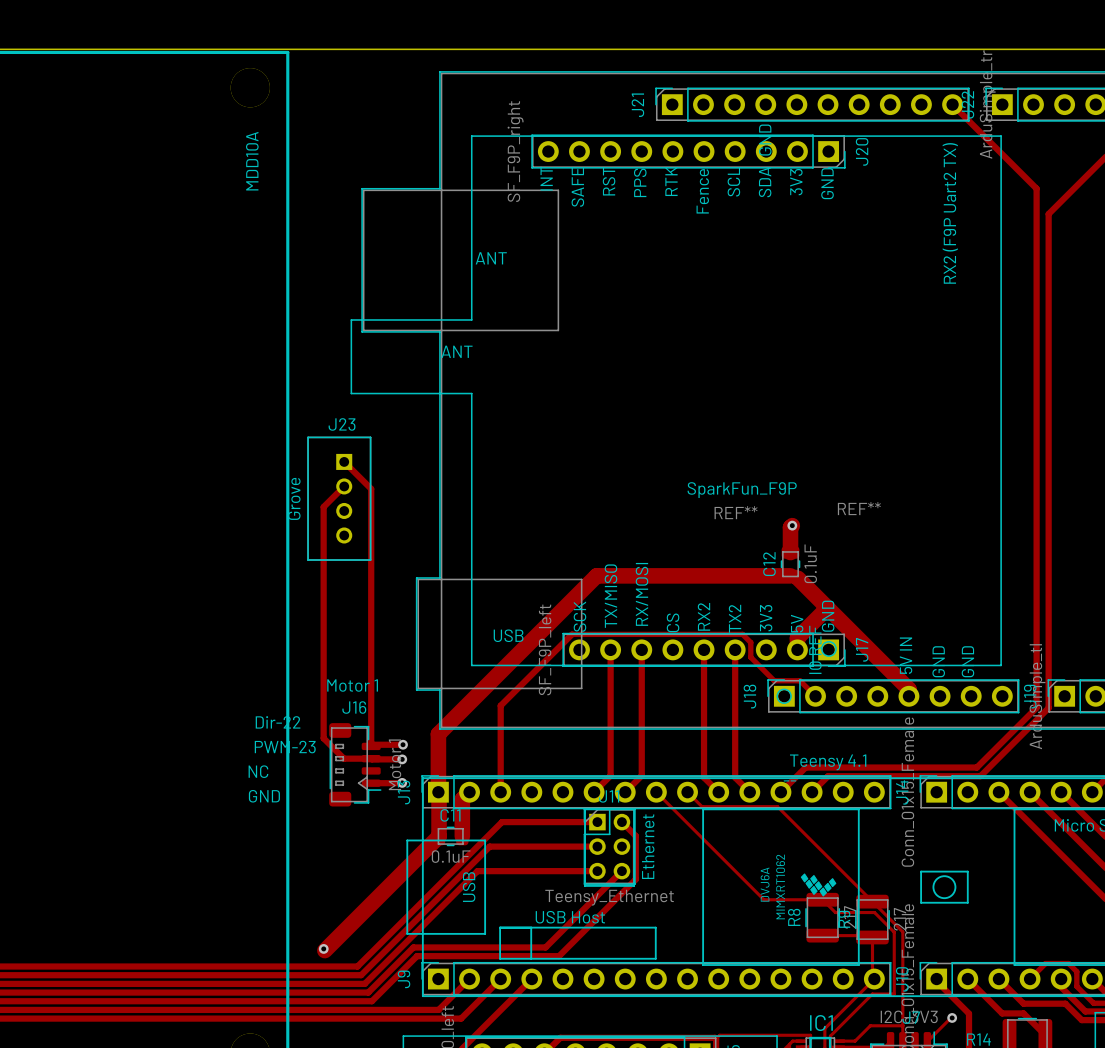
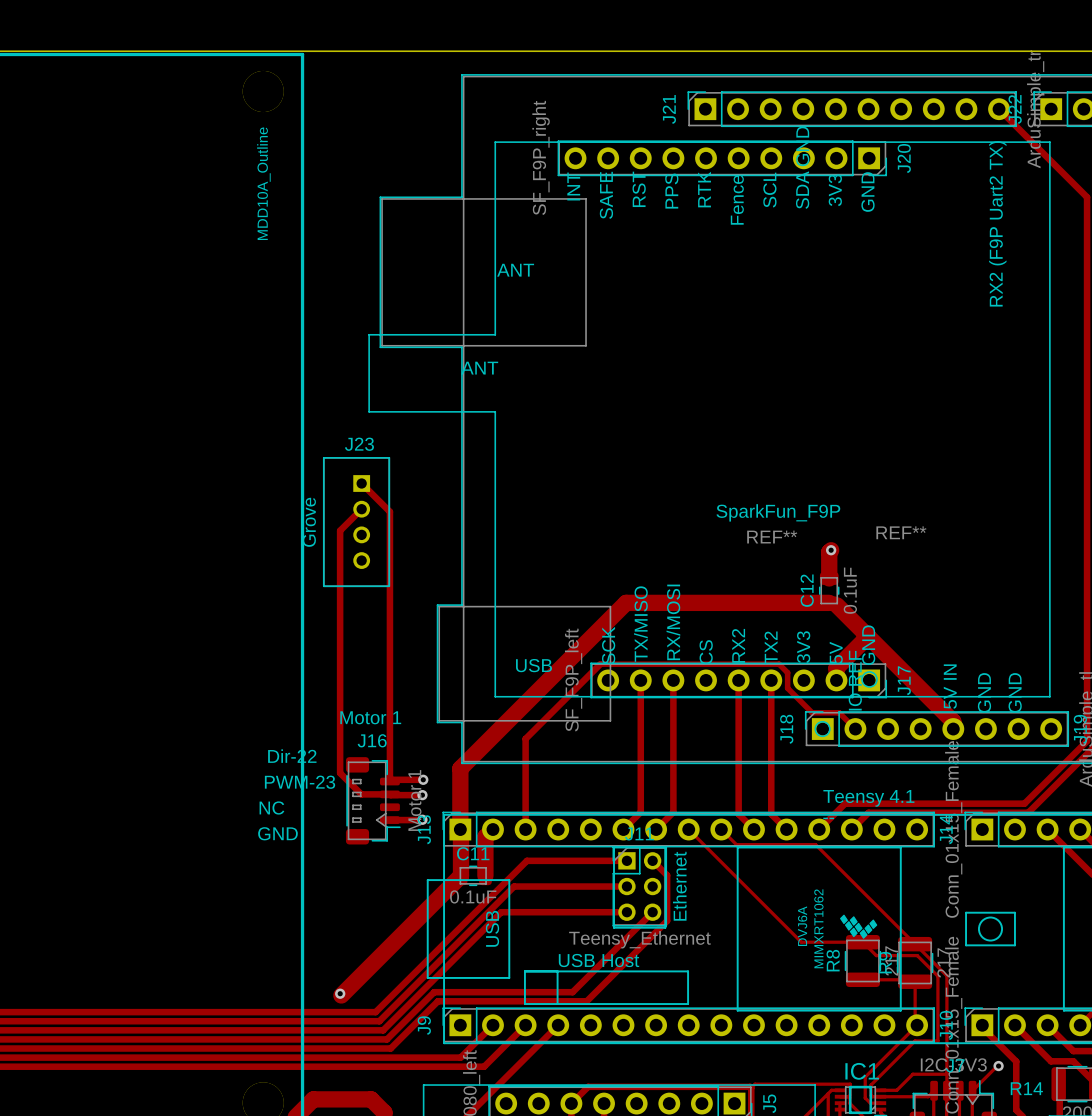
part value: MDD10A (252, 161) -> MDD10A_Outline (263, 183)

